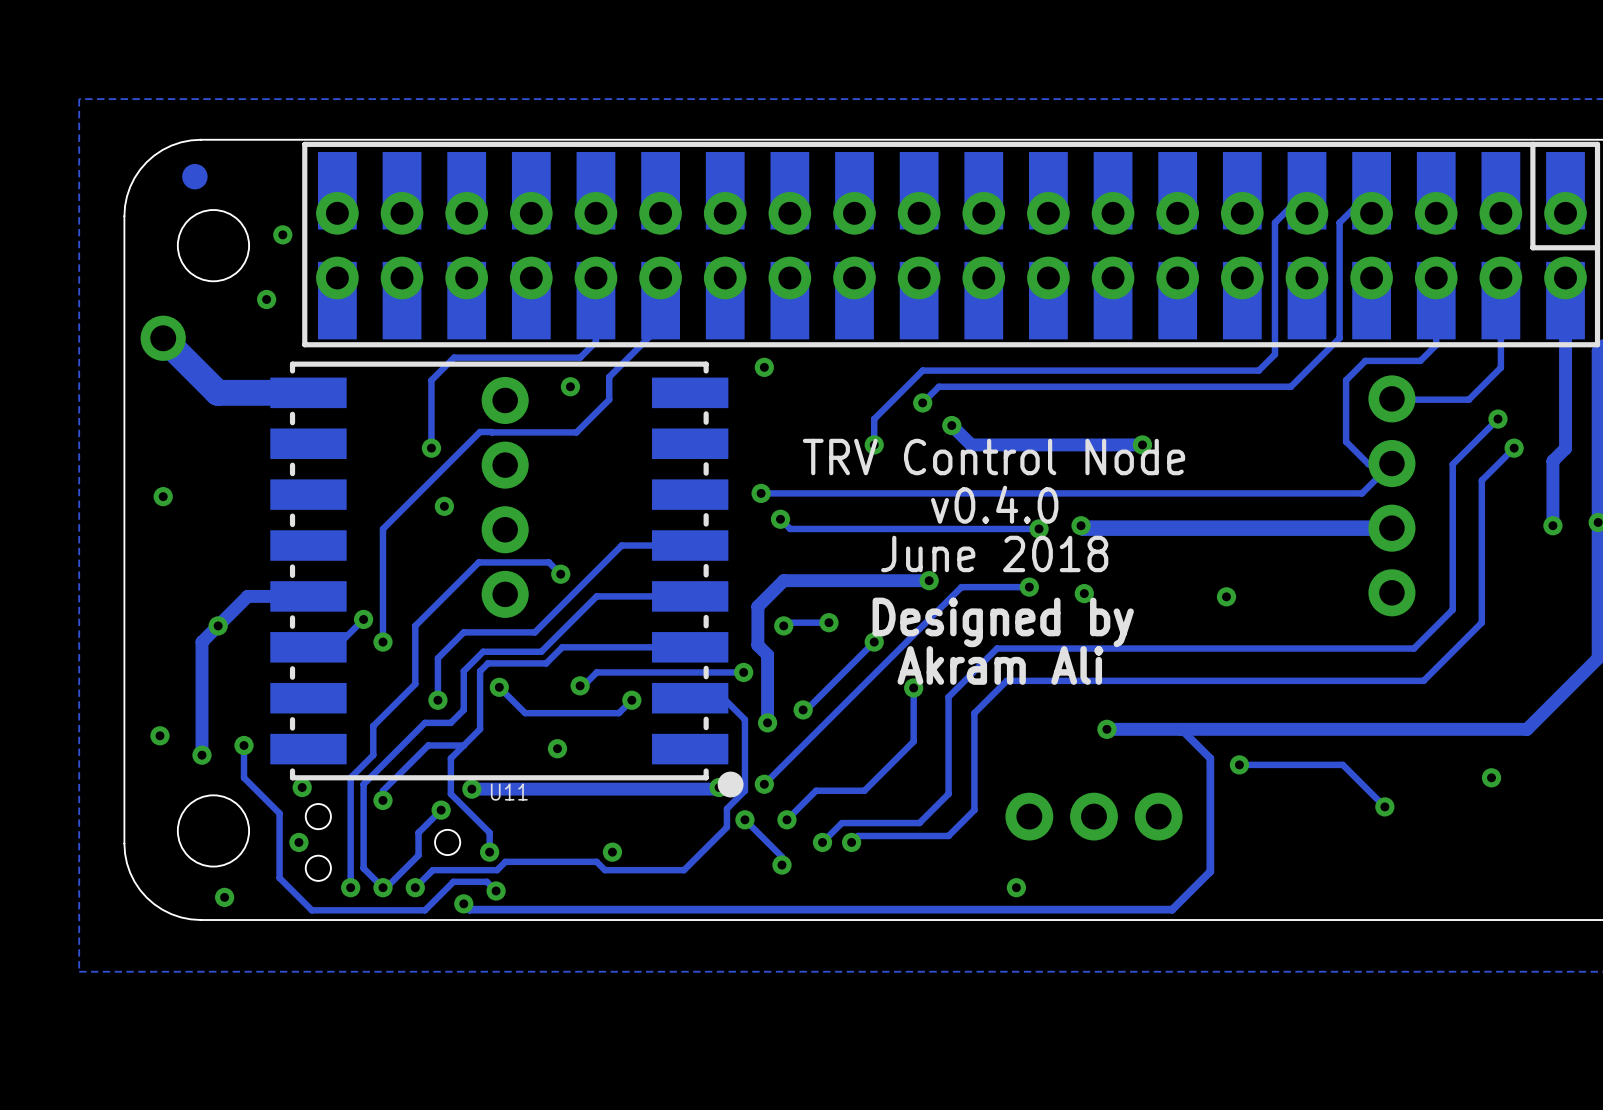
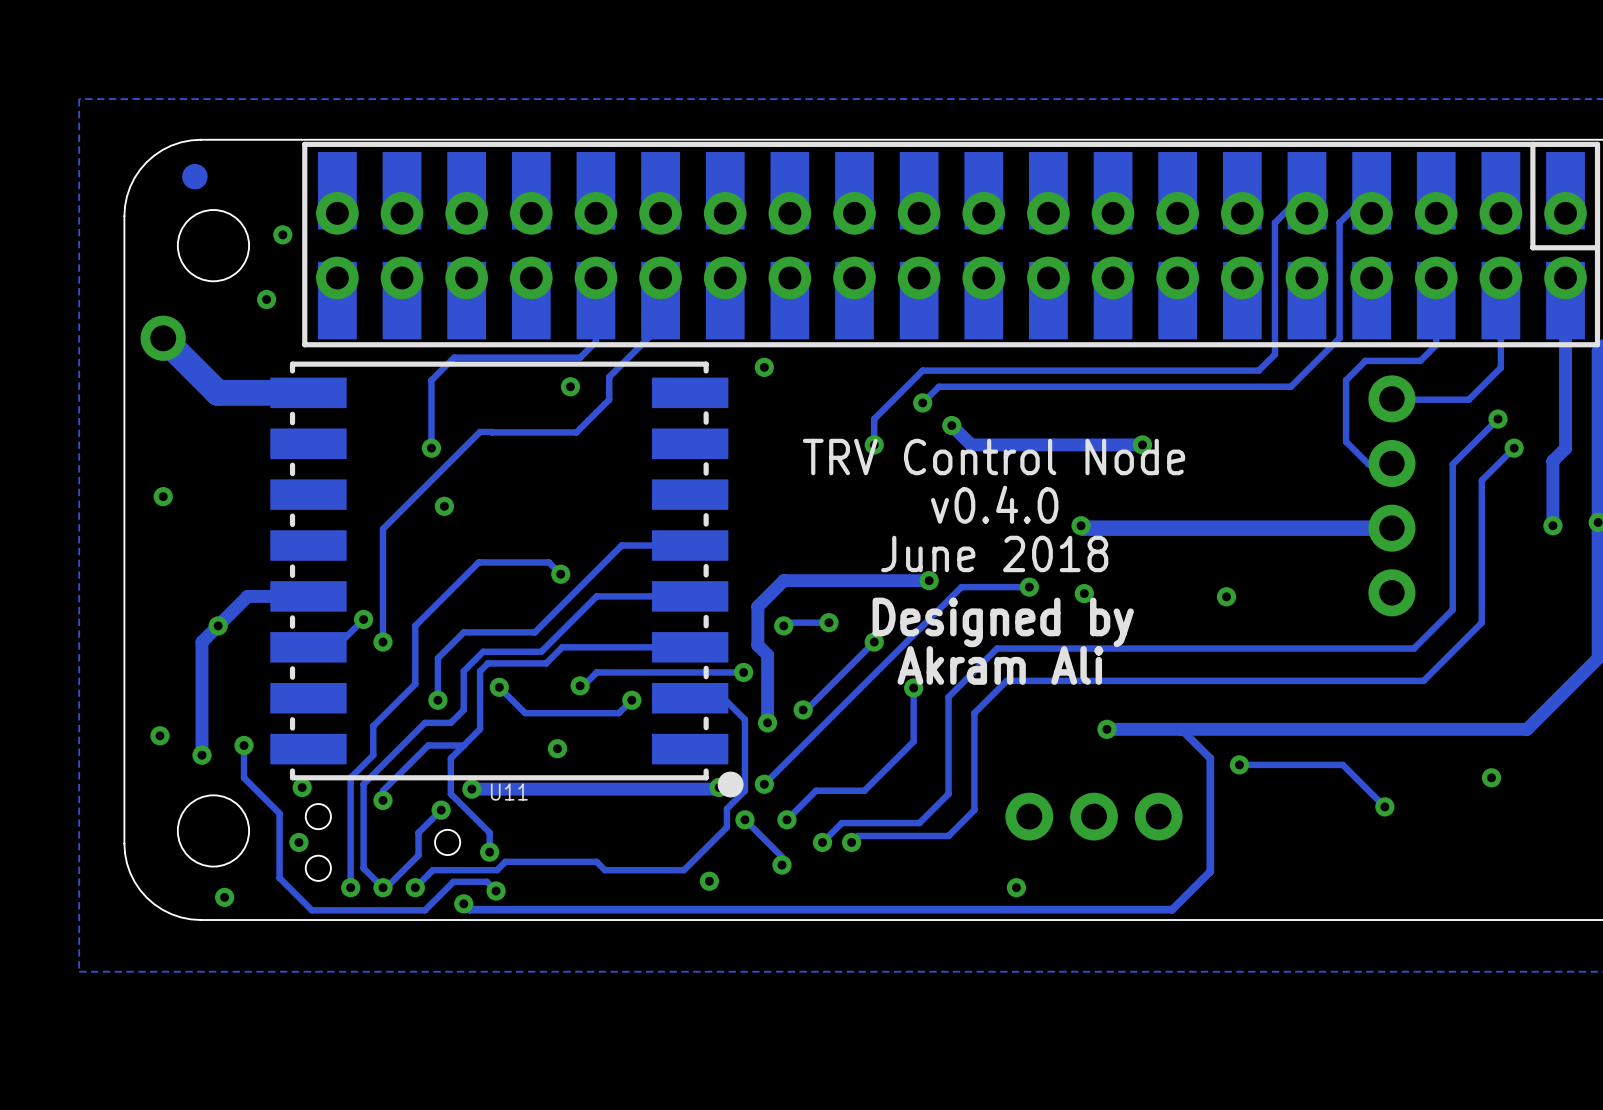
track: (1391, 463) (1362, 493) (761, 493) -> none
via: (761, 493) -> none
part: (505, 497) -> none
track: (780, 519) (790, 528) (1039, 528) -> none
via: (780, 519) -> none
via: (1039, 528) -> none
via position: (612, 852) -> (709, 881)

